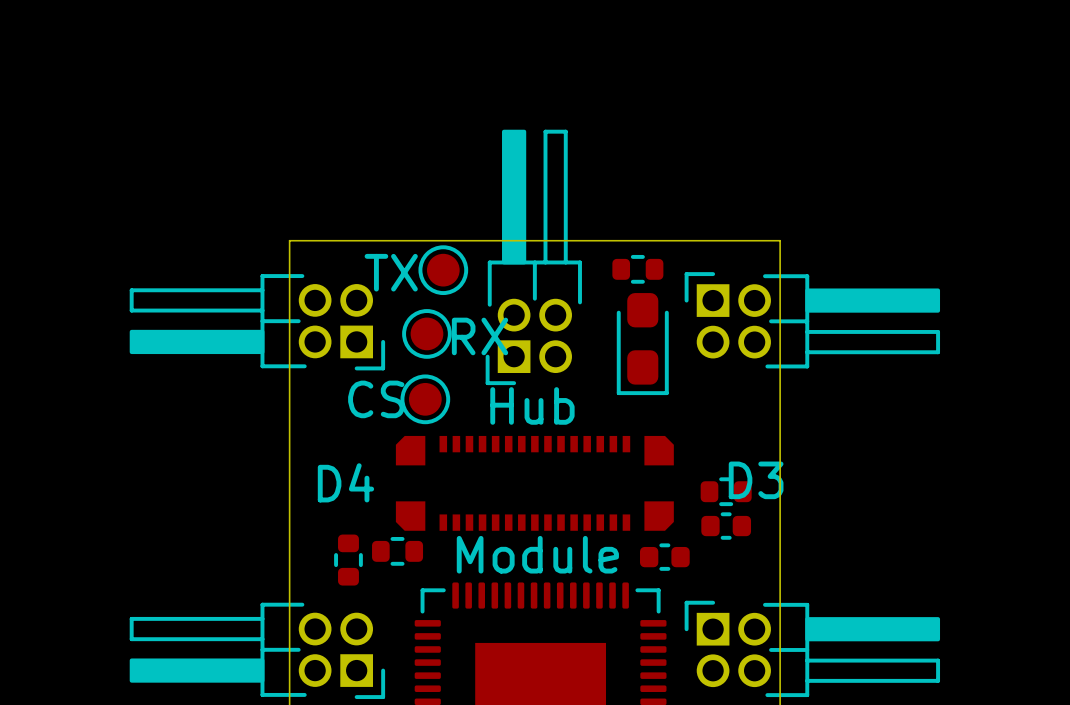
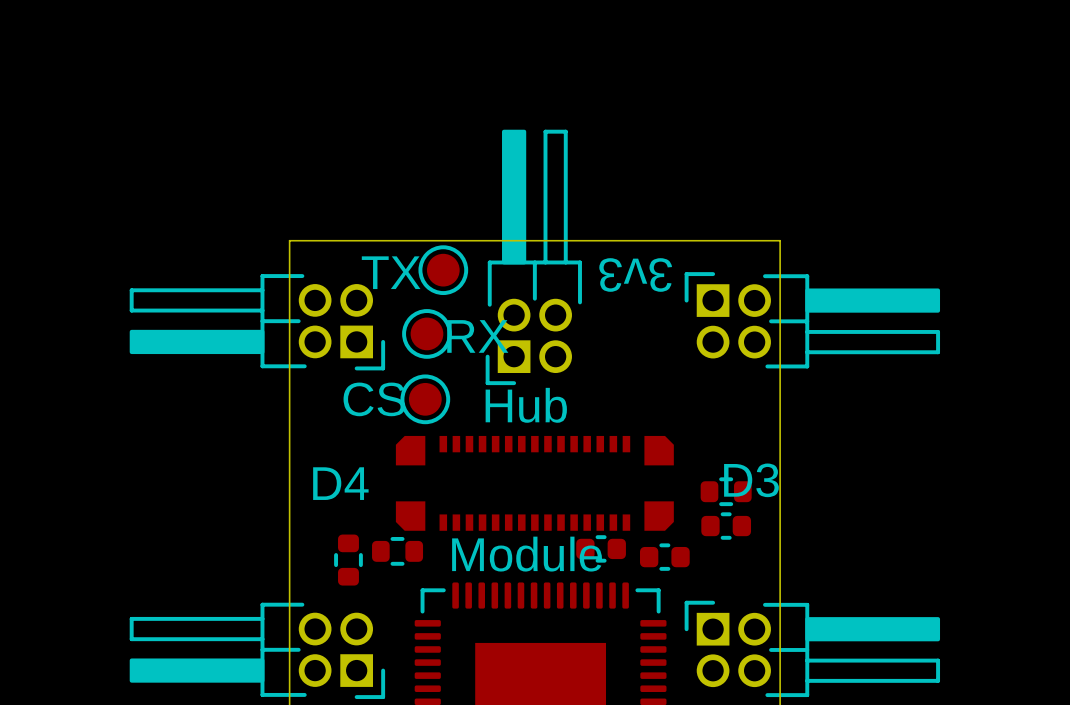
part: (637, 269) -> none
text: none -> 3v3 (635, 274)
part: (642, 344) -> none
part: none -> (601, 548)

